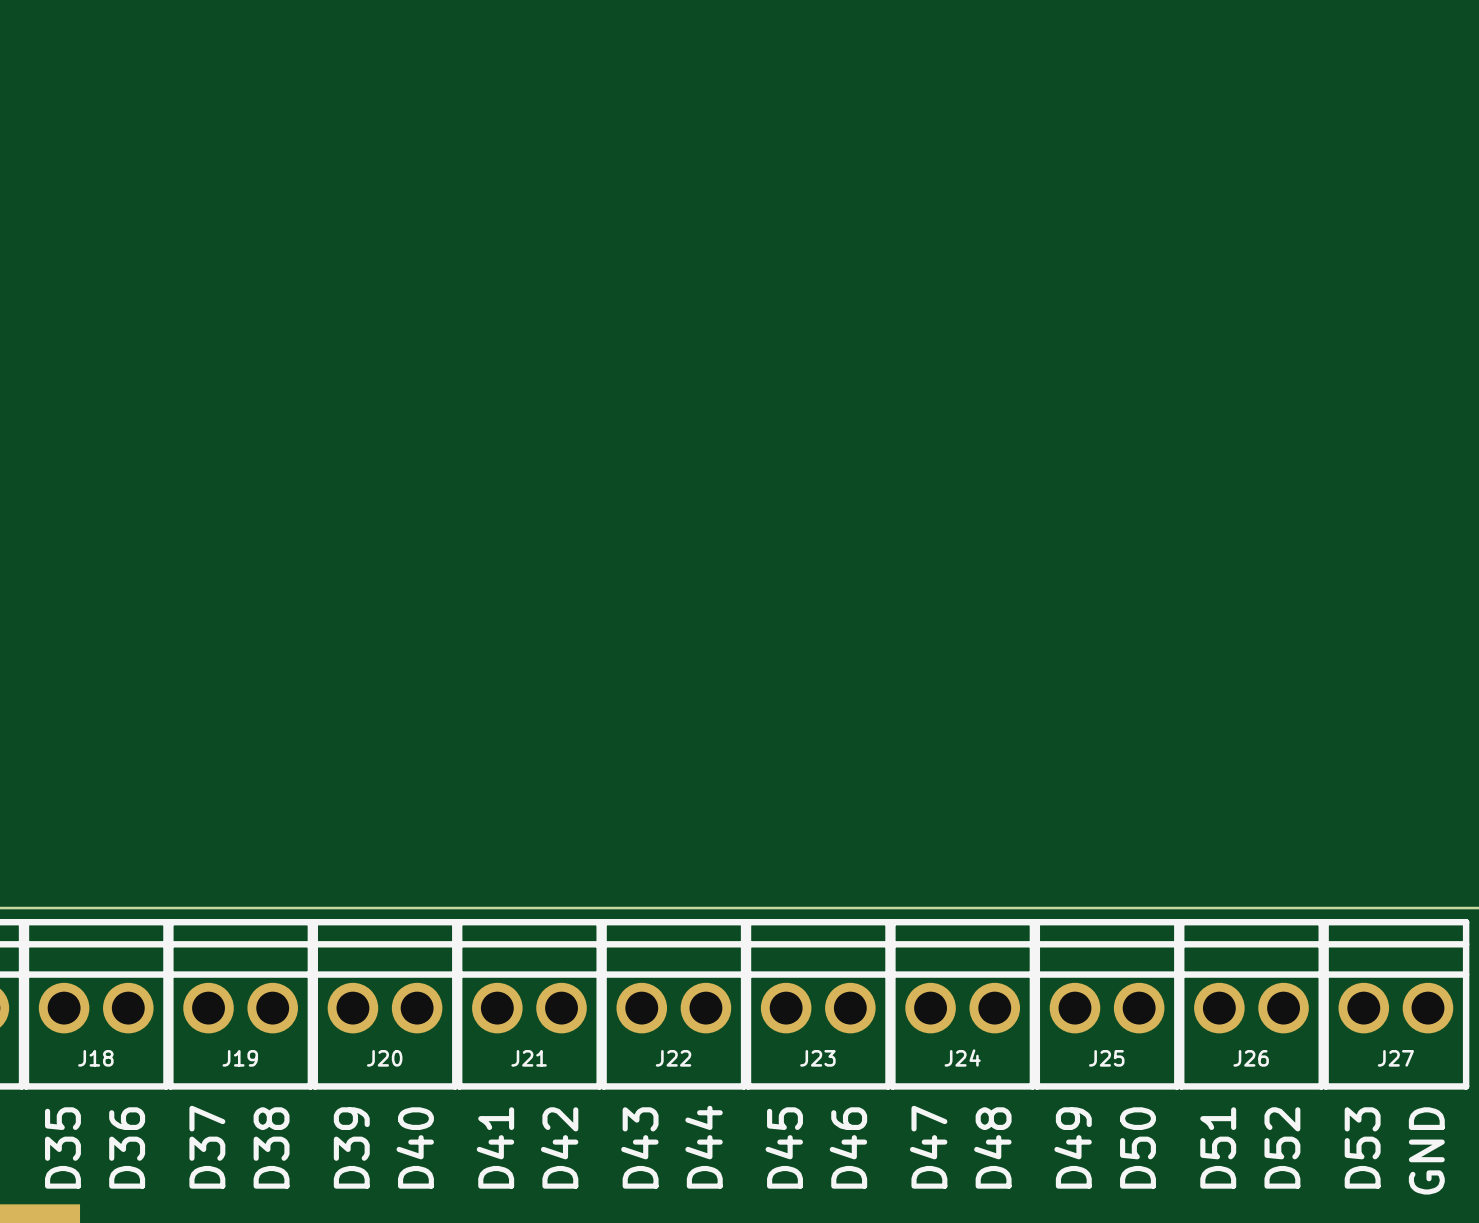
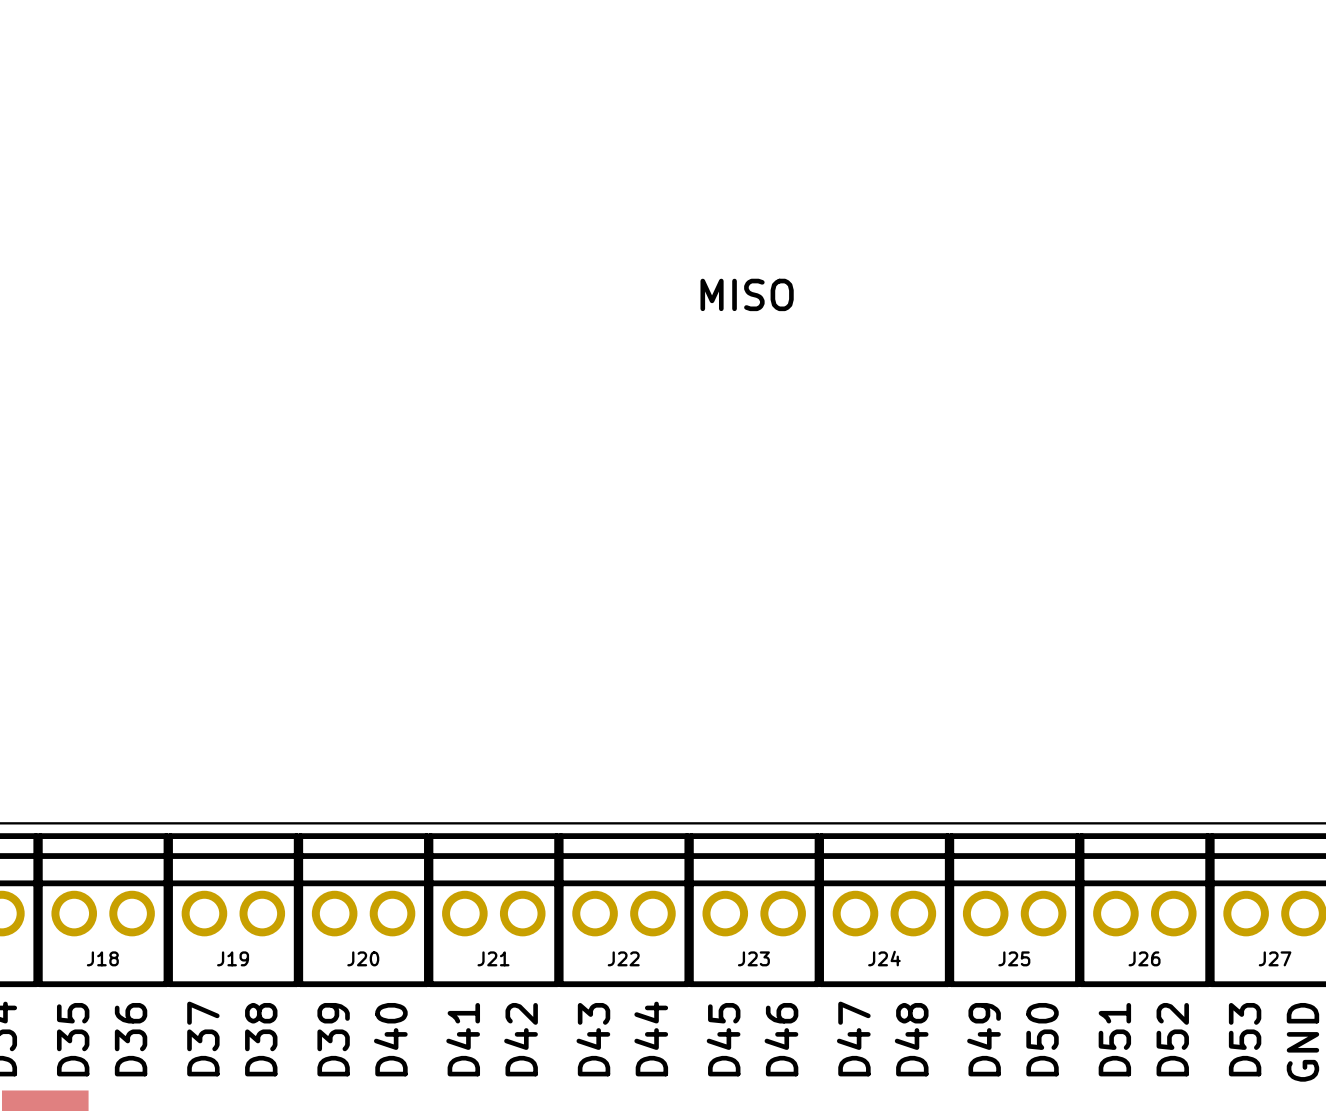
text: none -> MISO (747, 294)

